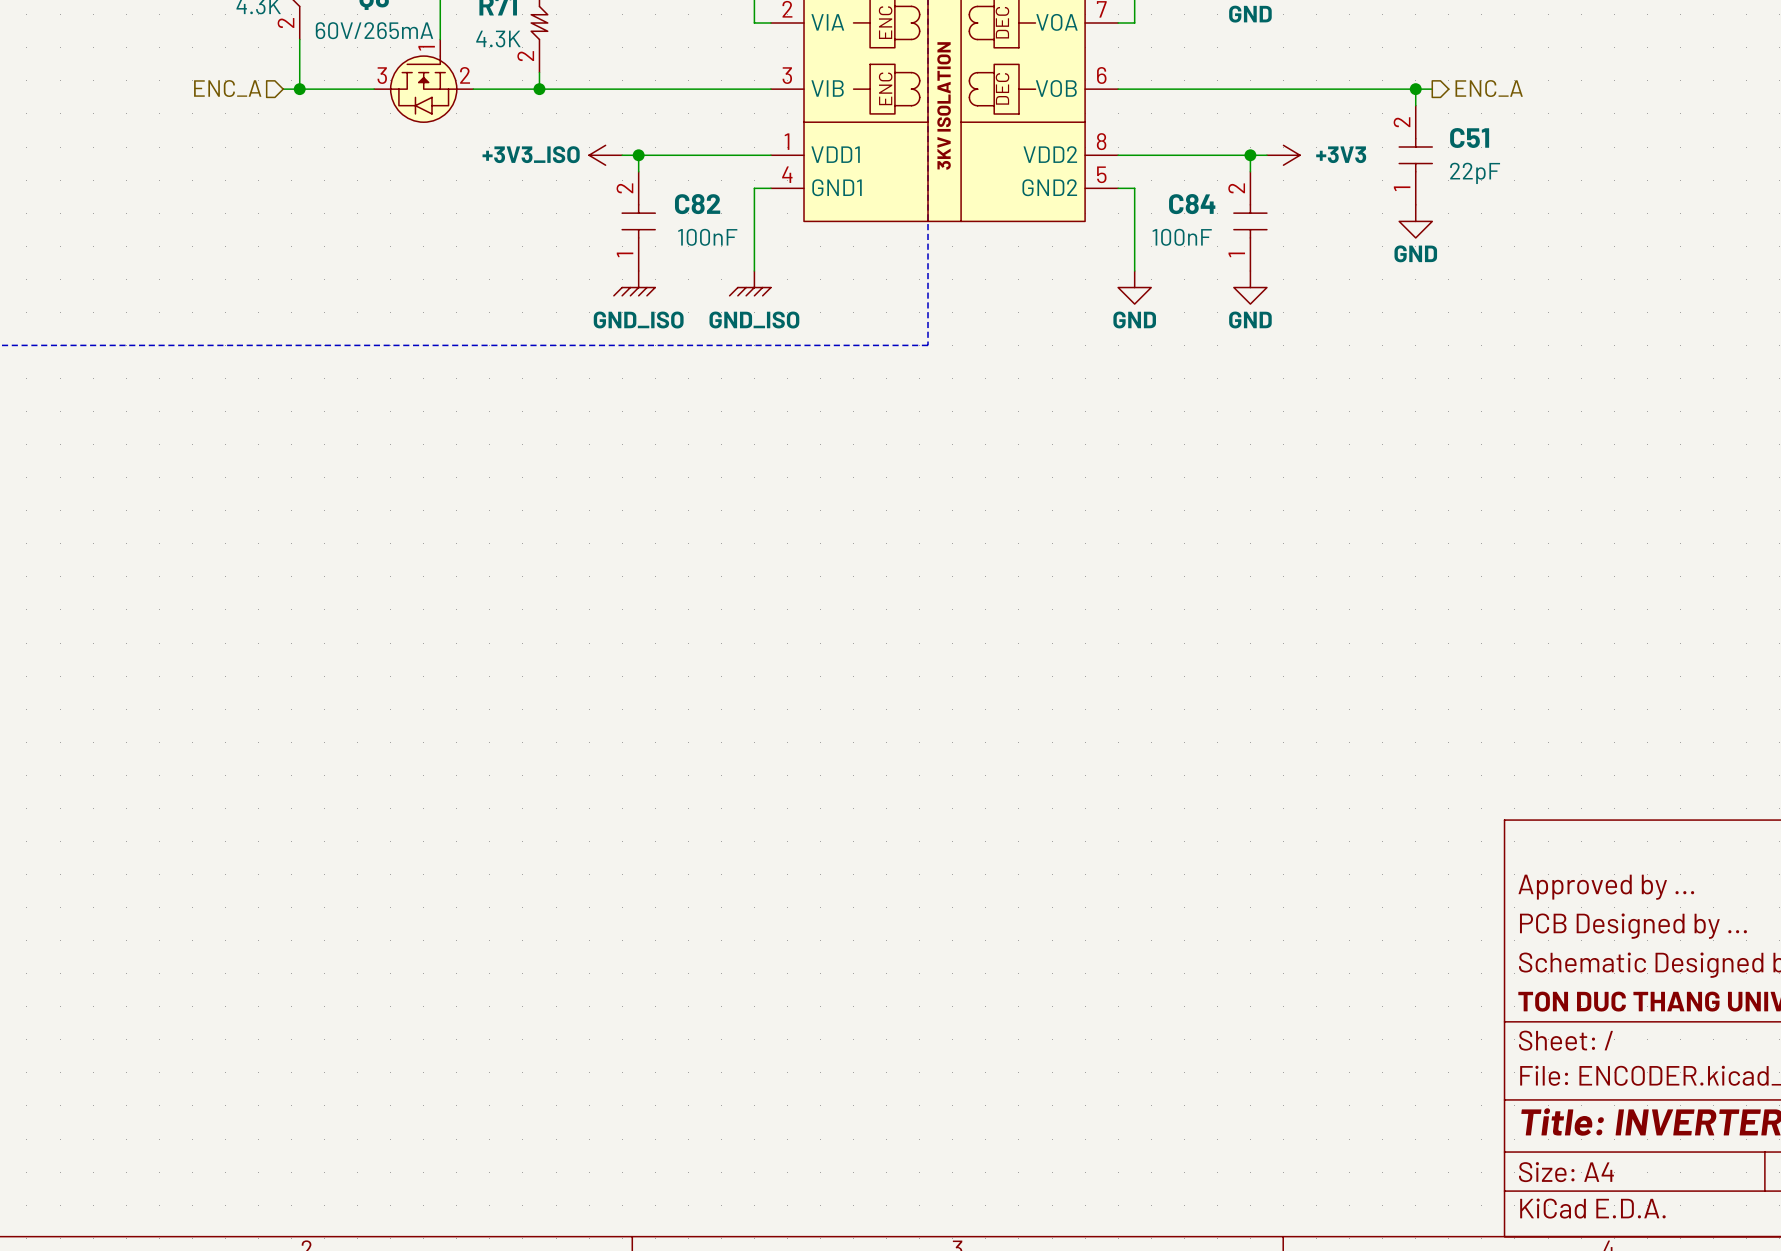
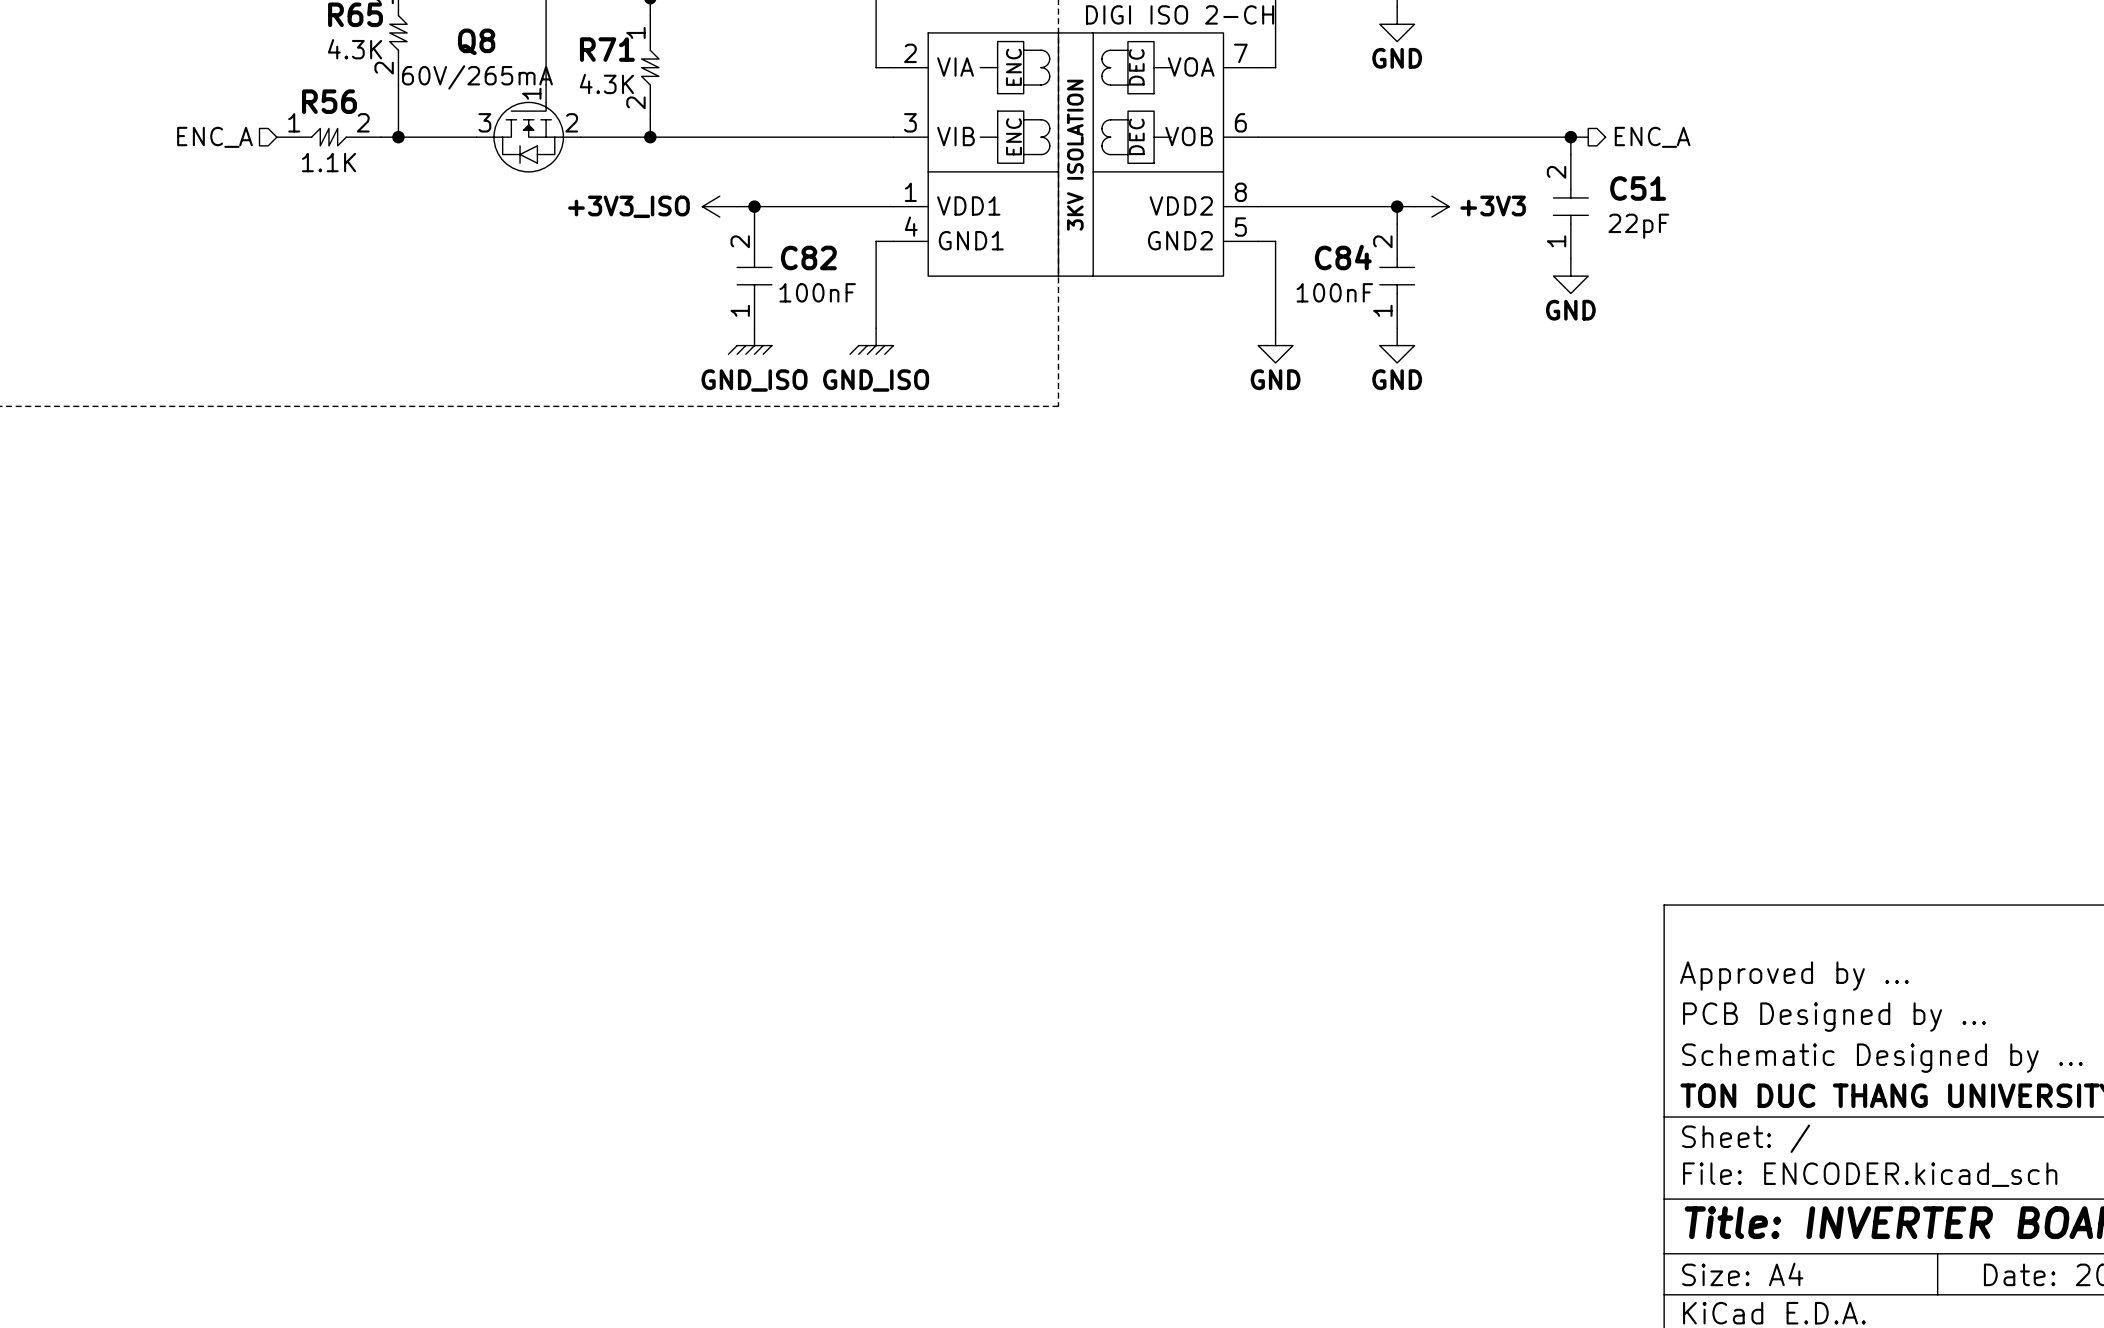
hierarchical label position: ENC_A (227, 88) -> ENC_A (214, 137)
R56: none -> 1.1K (328, 137)

